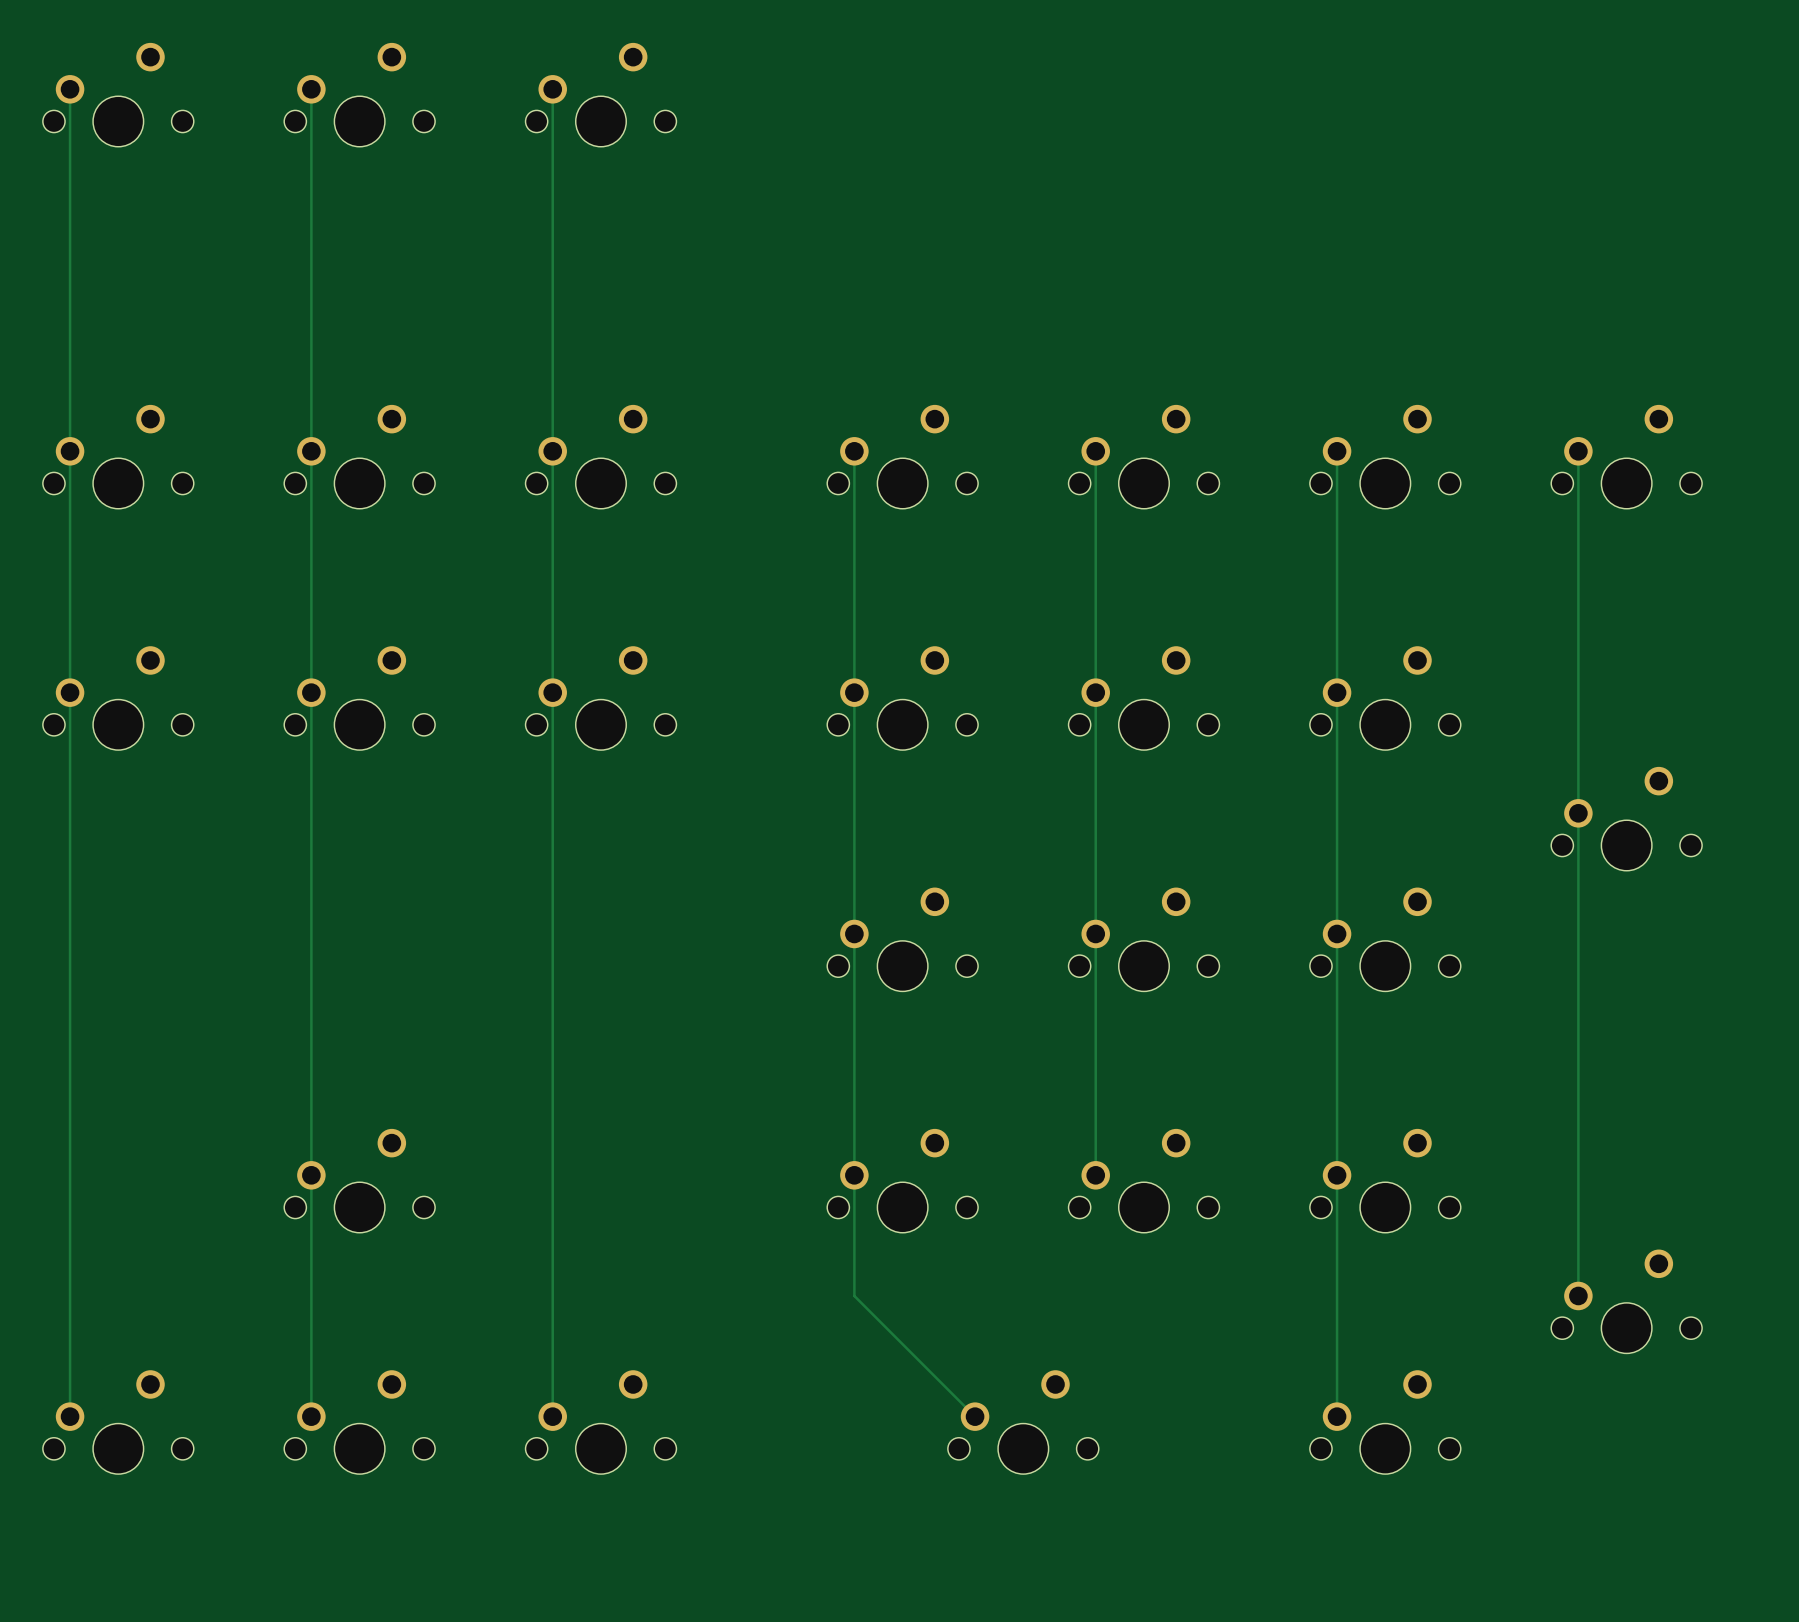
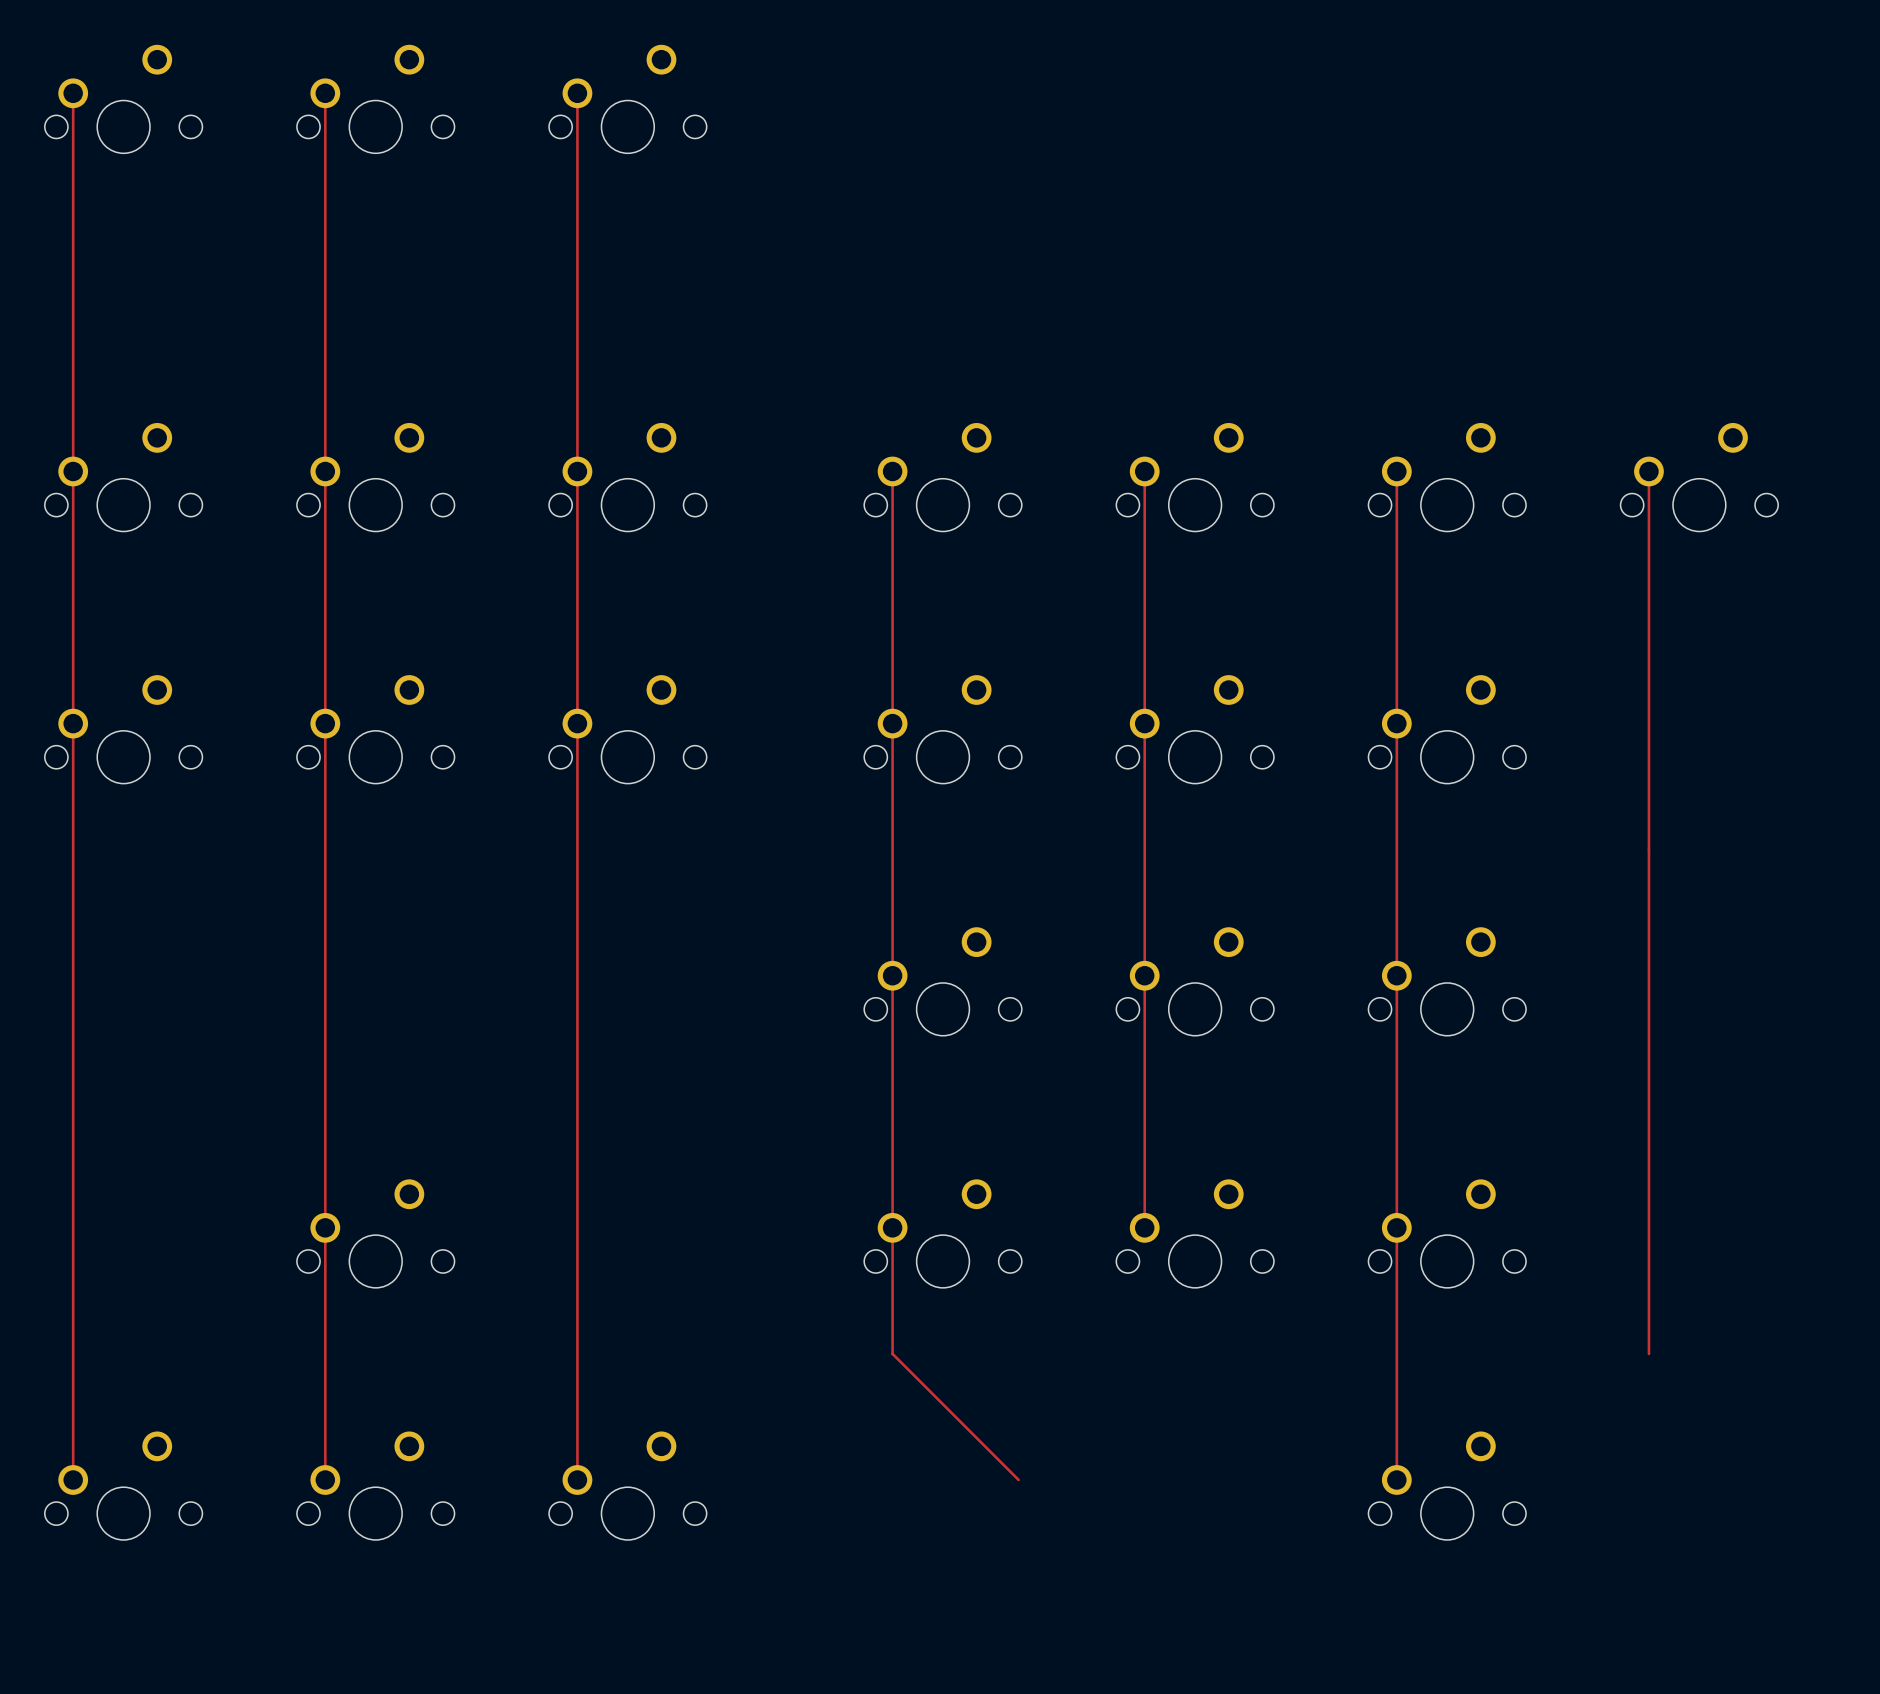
part: (1626, 818) -> none
part: (1626, 1301) -> none
part: (1023, 1422) -> none

